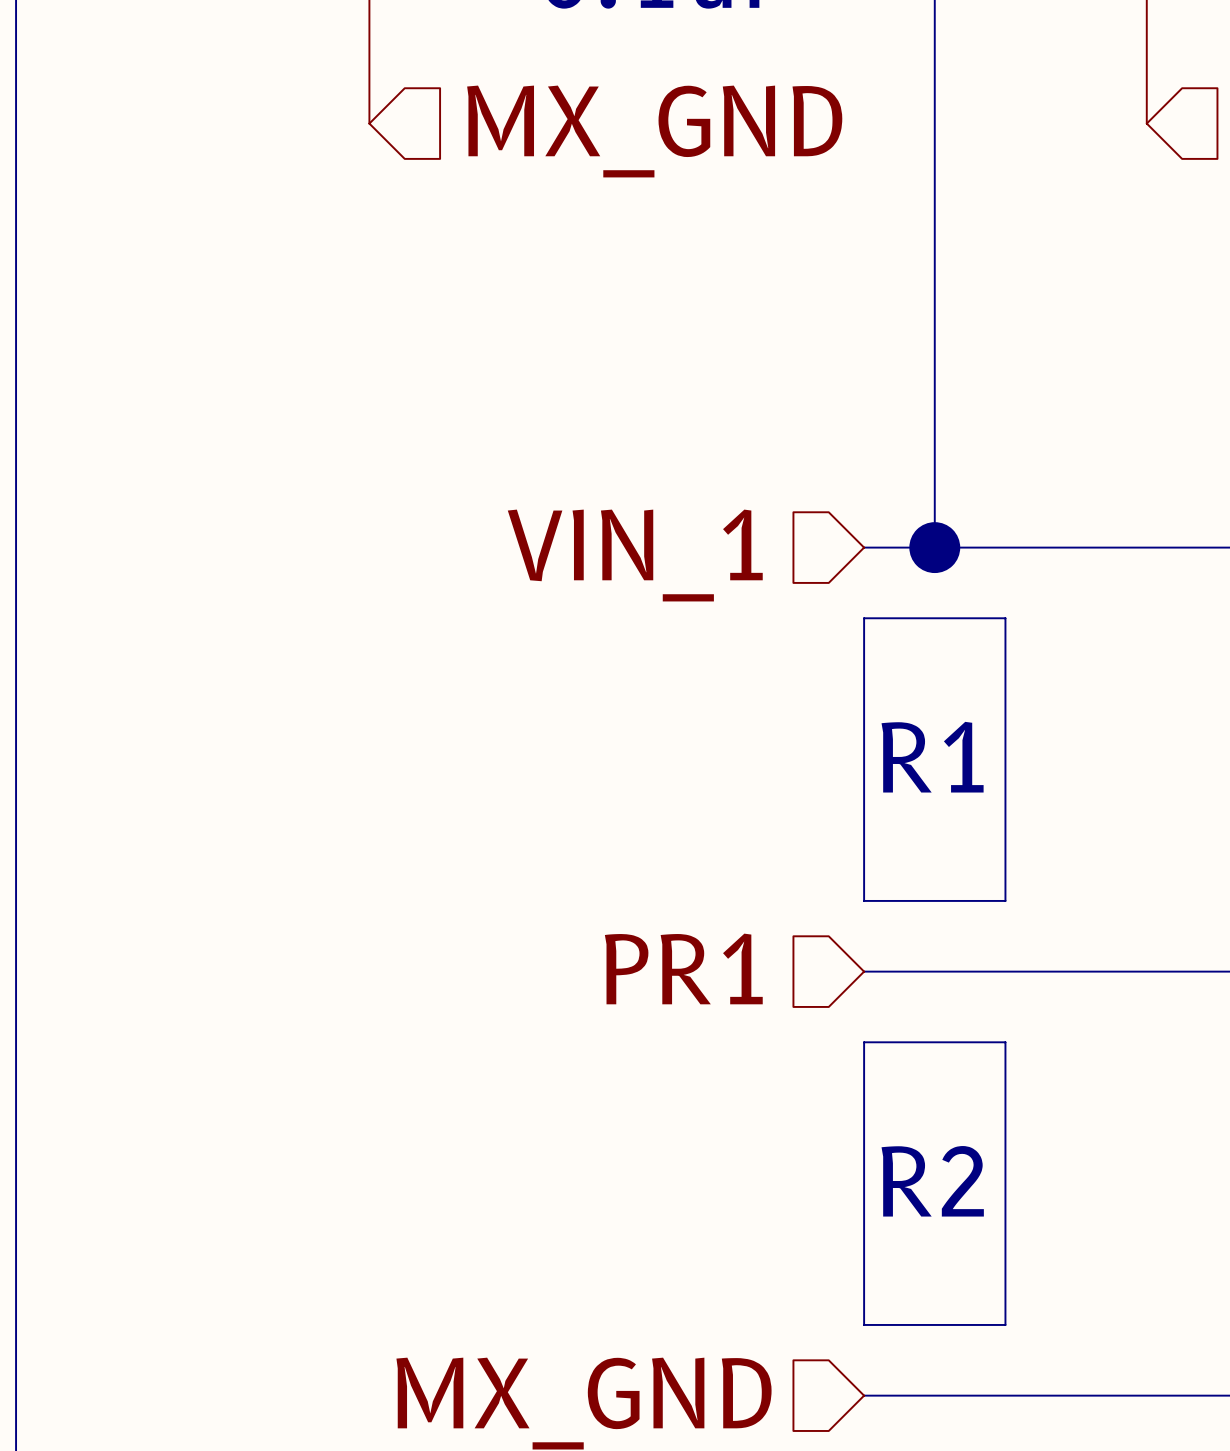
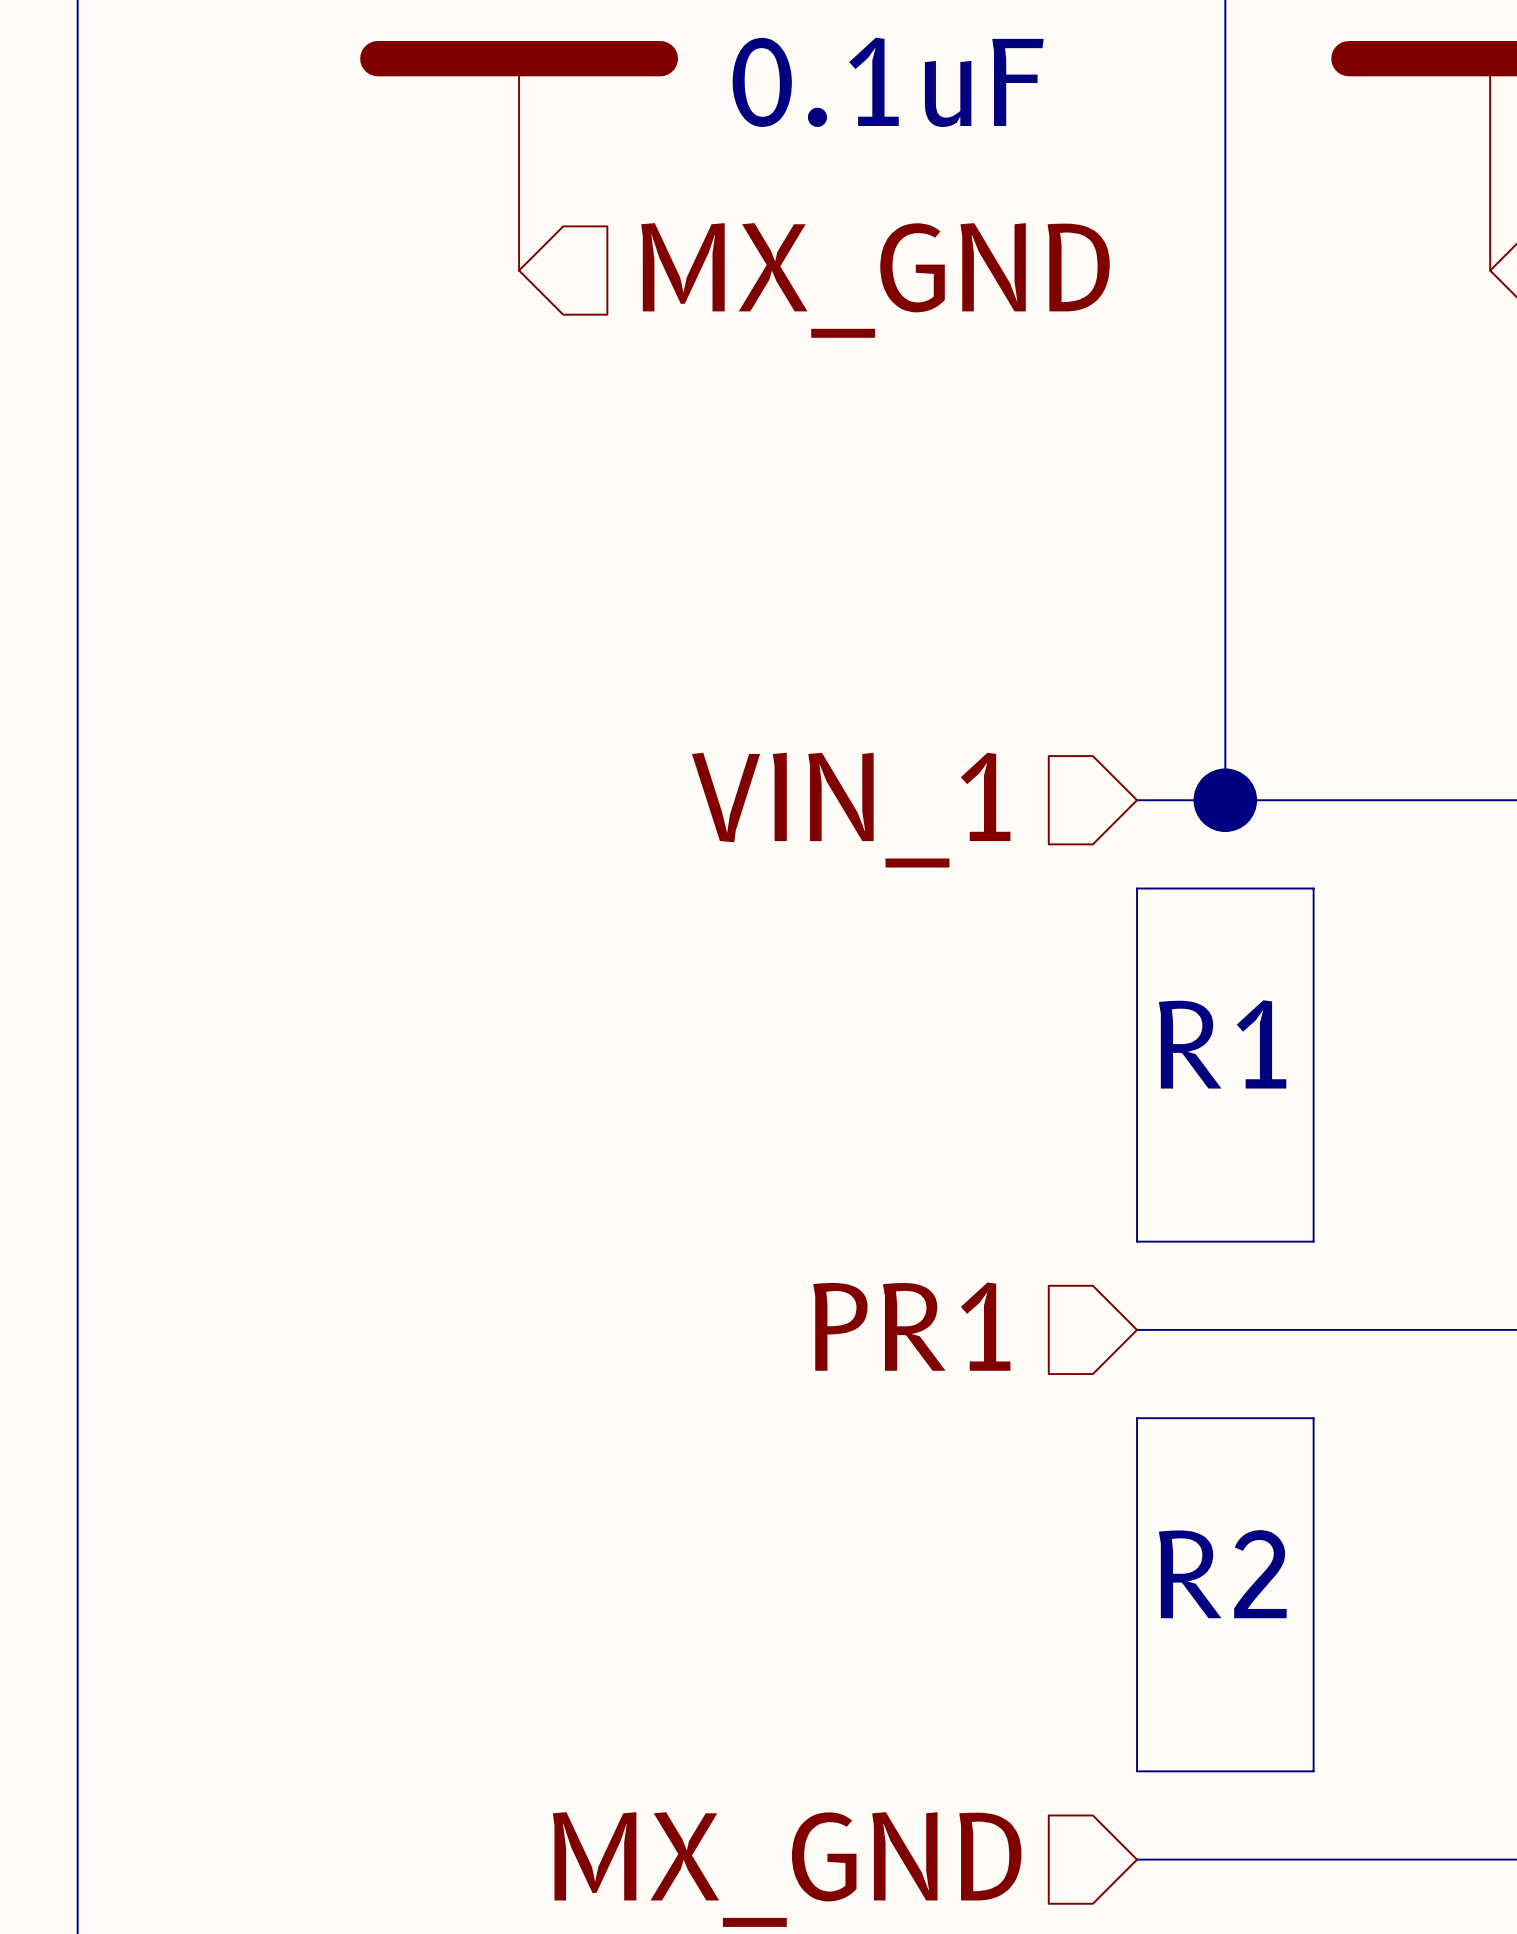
text position: R1 (932, 757) -> R1 (1222, 1044)
text position: R2 (932, 1181) -> R2 (1222, 1574)

